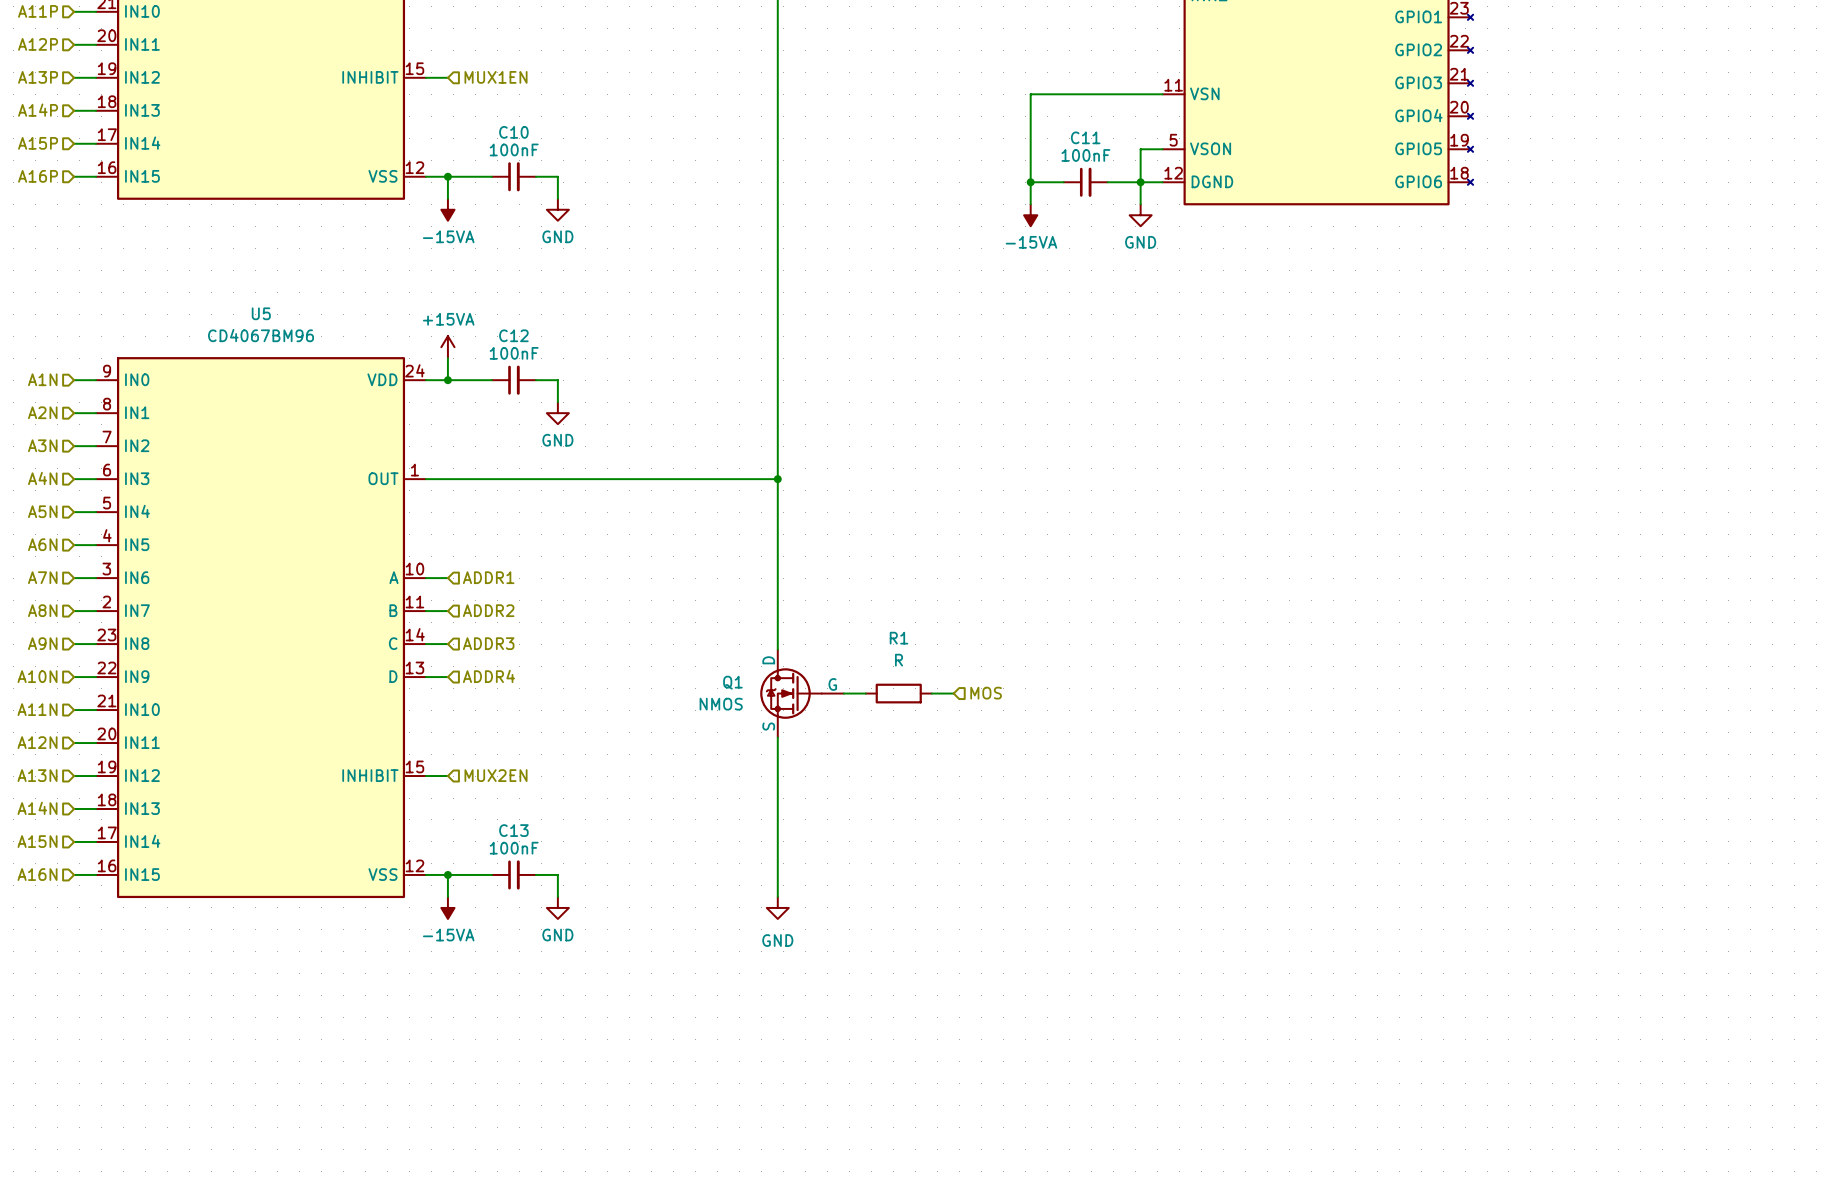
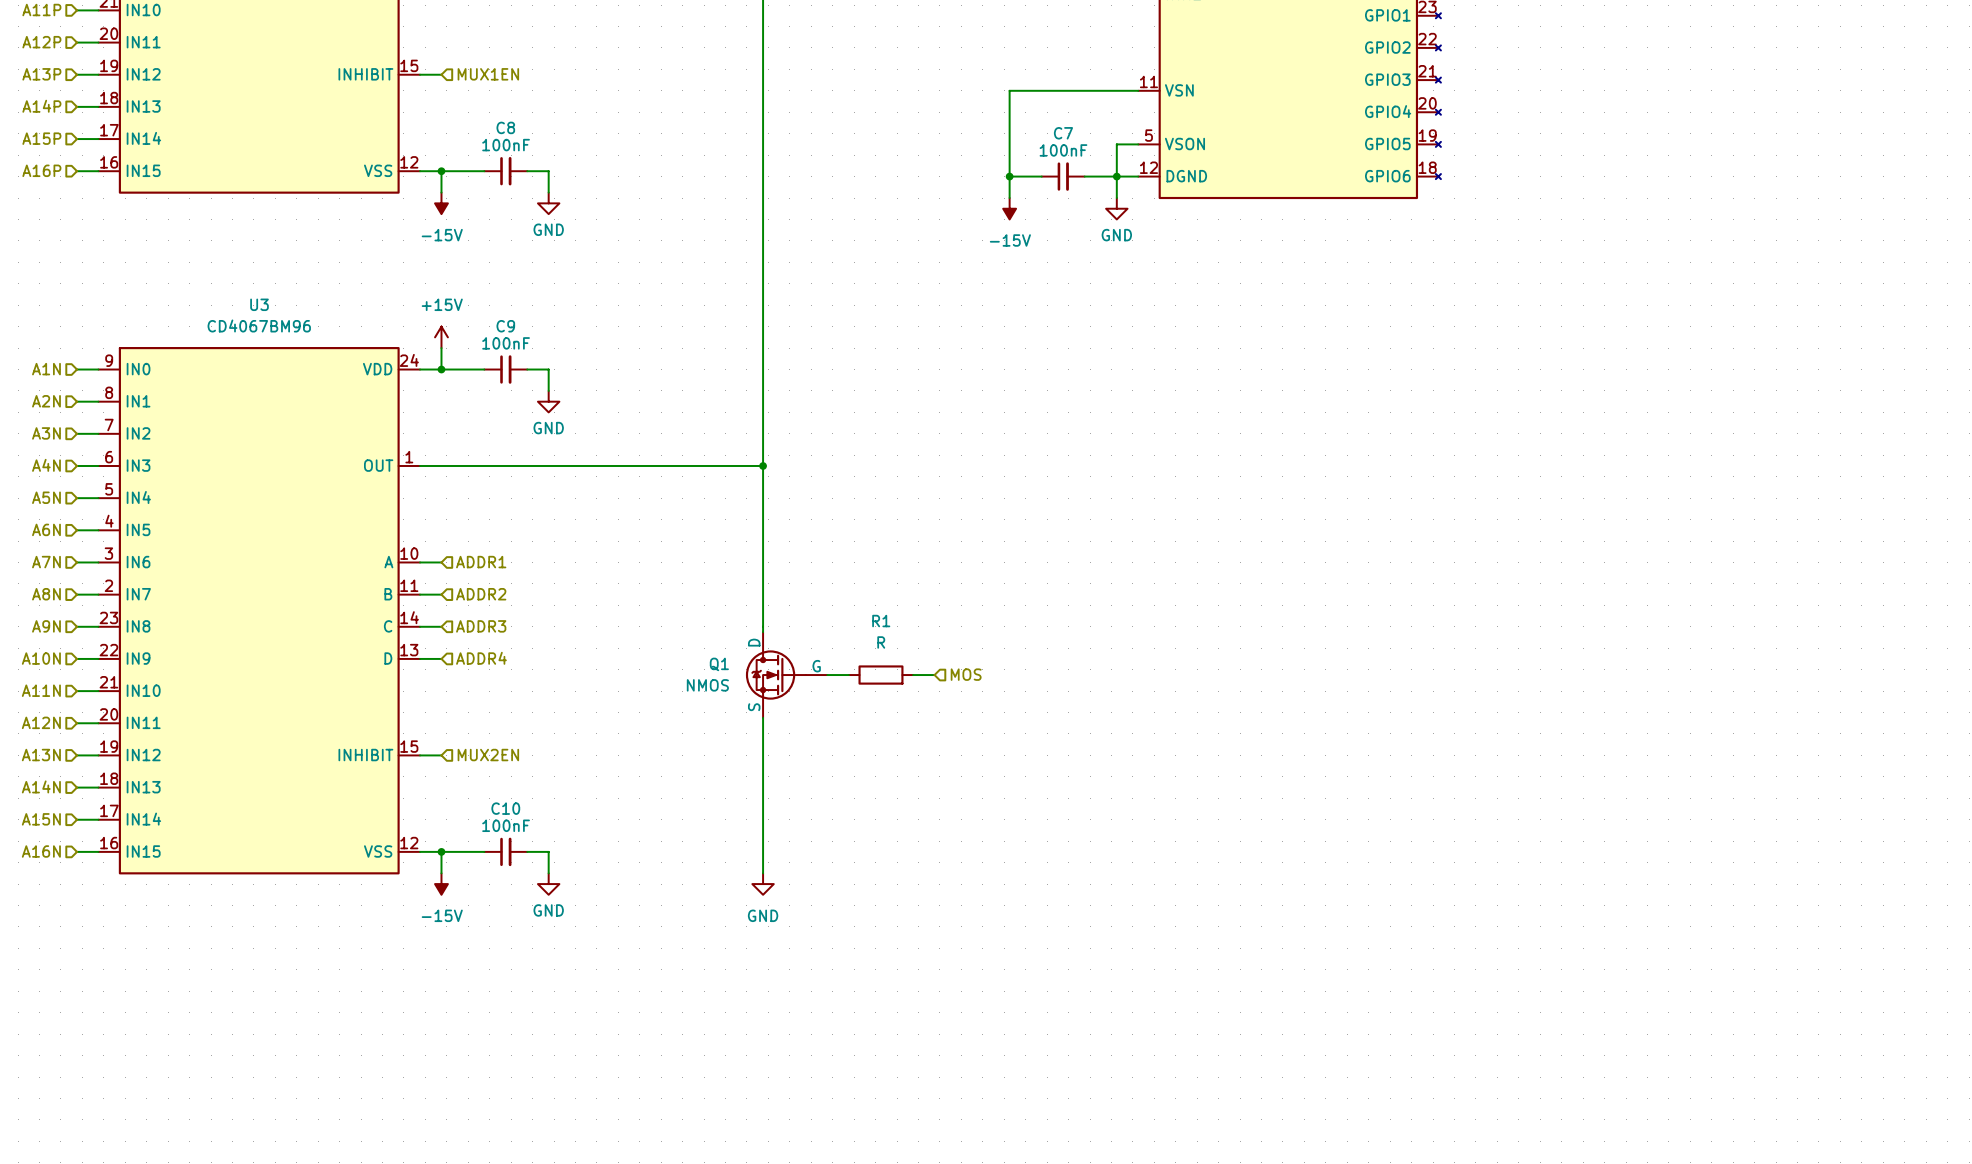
C10 name: C10 (513, 132) -> C8 (505, 127)
C11 name: C11 (1085, 137) -> C7 (1063, 133)
power symbol: -15VA (447, 209) -> -15V (441, 203)
power symbol: -15VA (1030, 215) -> -15V (1009, 208)
U5 name: U5 (261, 313) -> U3 (259, 304)
C12 name: C12 (513, 335) -> C9 (505, 326)
power symbol: +15VA (447, 347) -> +15V (441, 337)
C13 name: C13 (513, 830) -> C10 (505, 808)
power symbol: -15VA (447, 907) -> -15V (441, 884)

